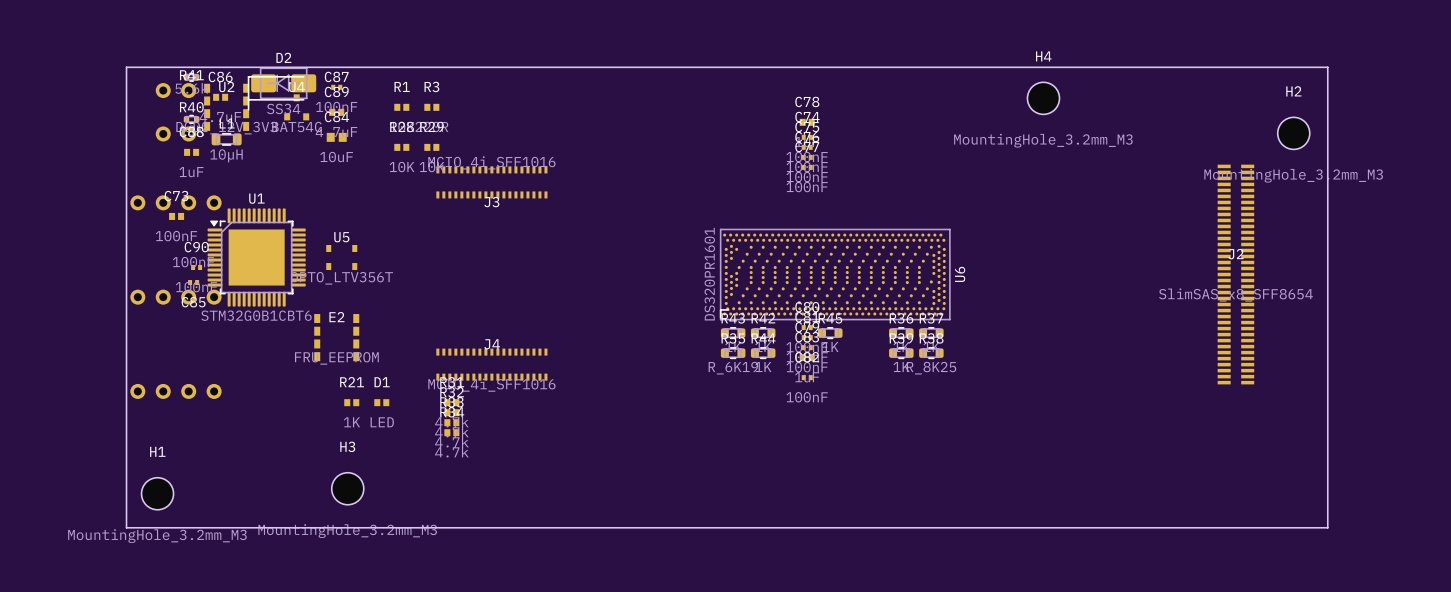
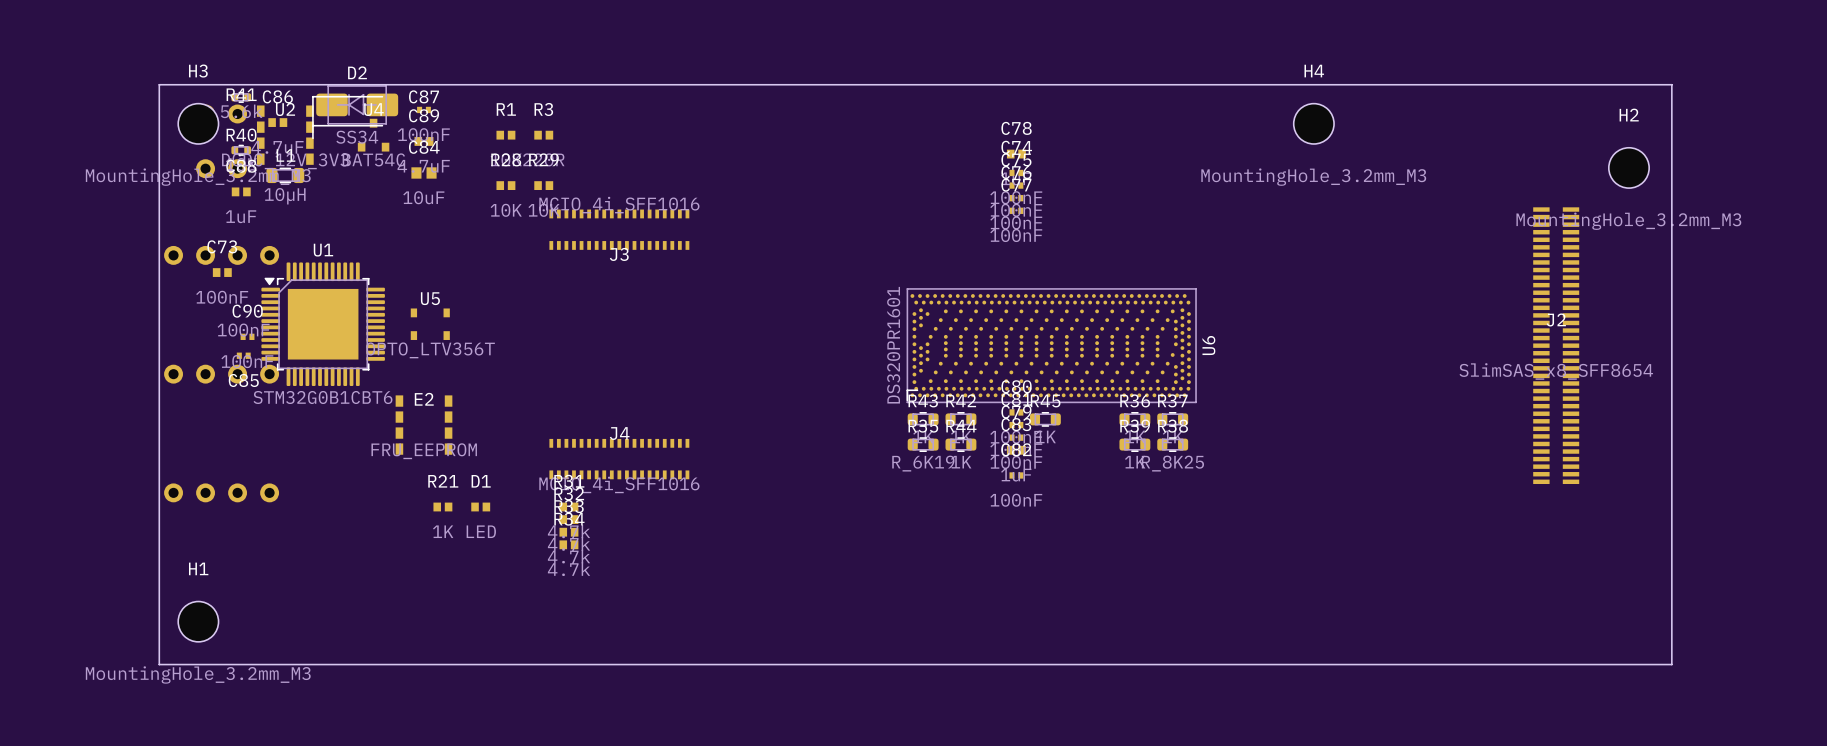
H3 position: (347, 488) -> (198, 123)

